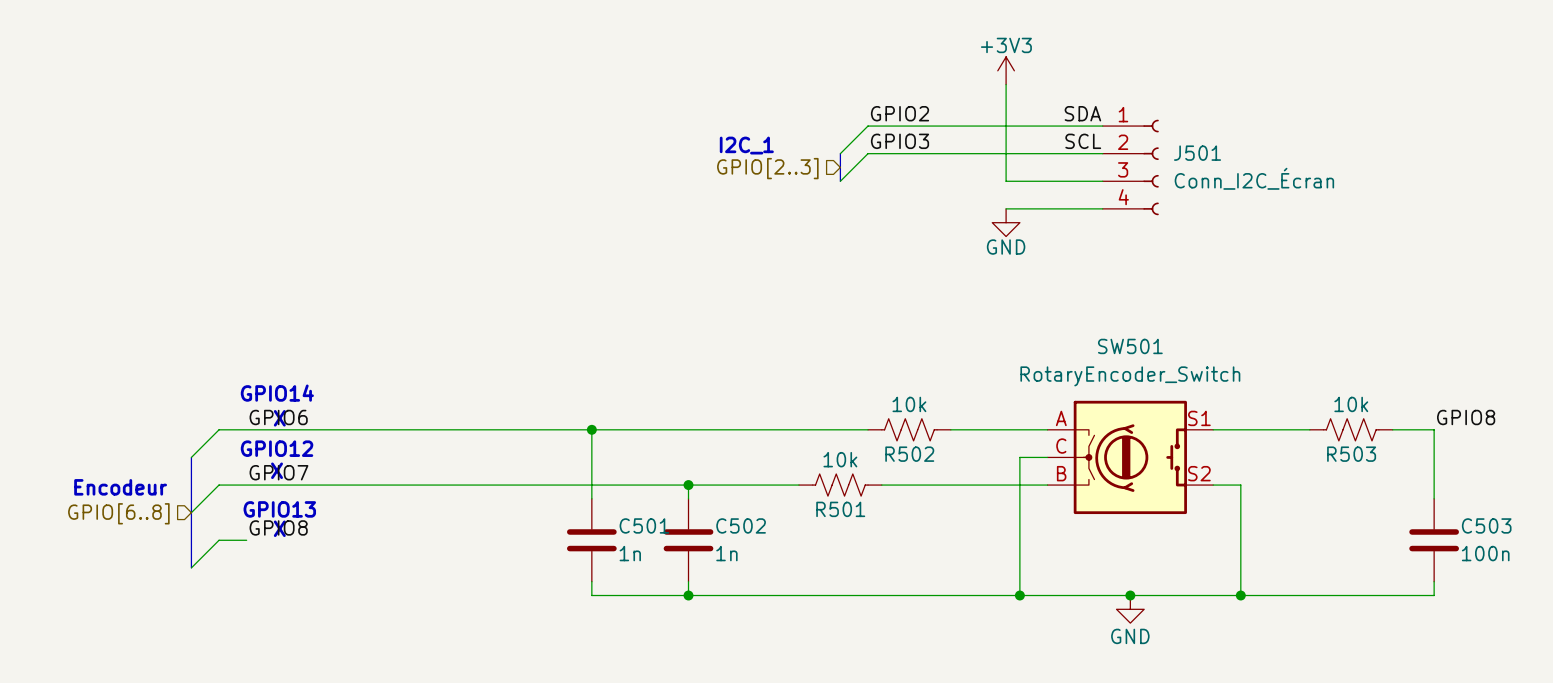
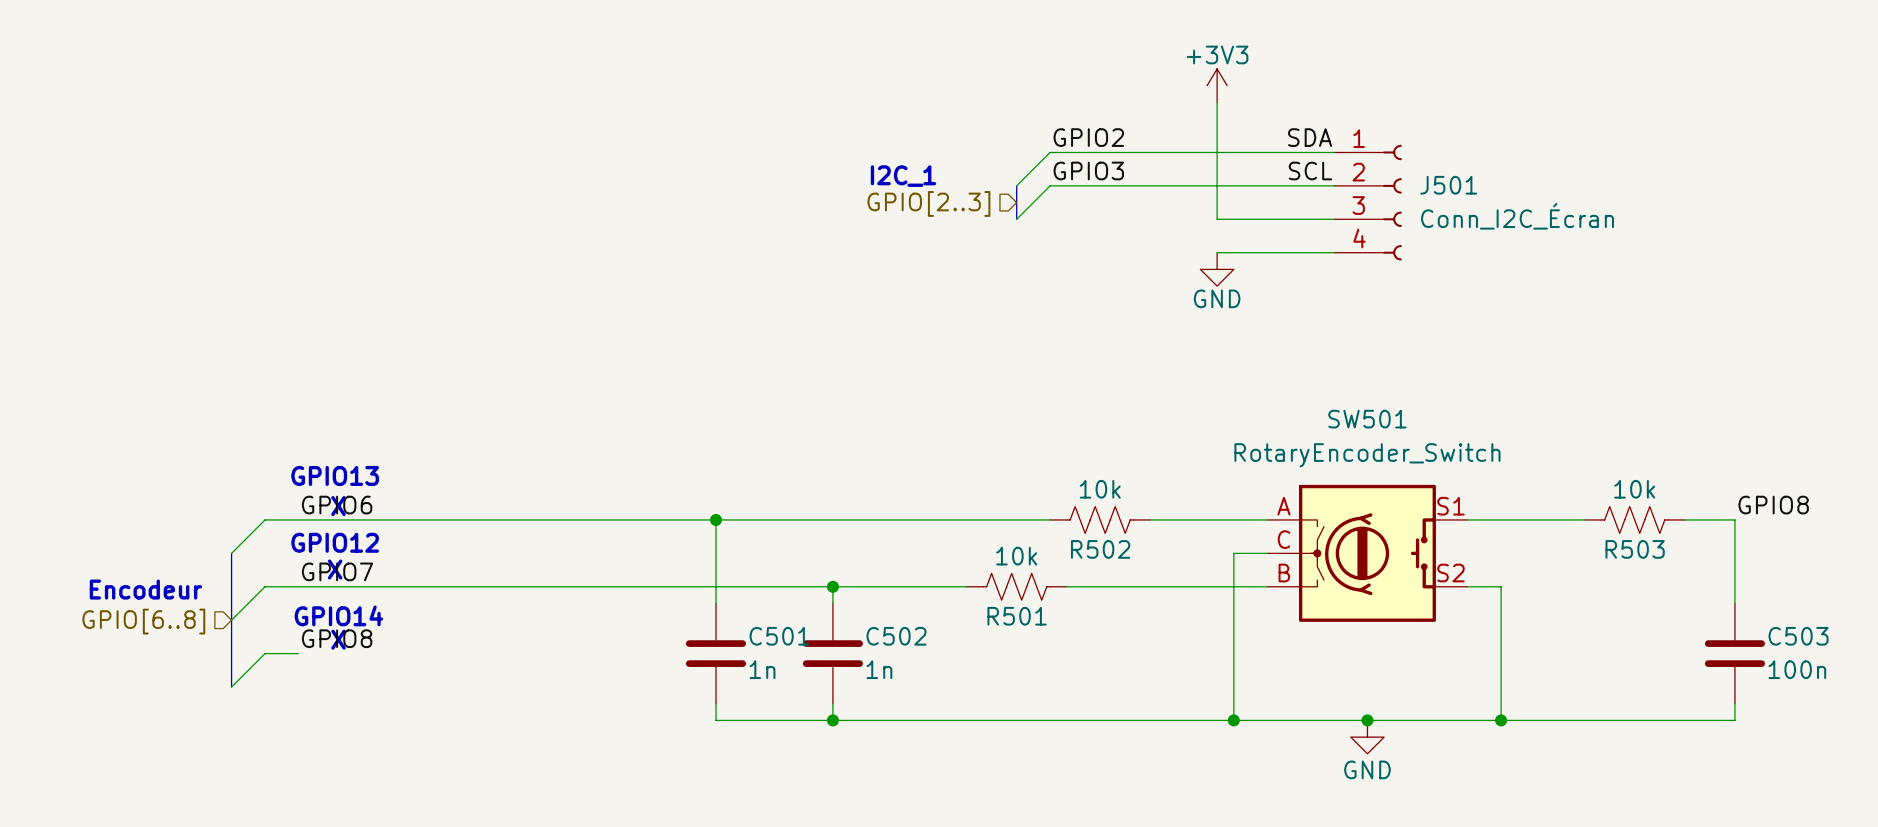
text: GPIO14 (277, 393) -> GPIO13 (335, 475)
text: GPIO13 (279, 509) -> GPIO14 (338, 615)

